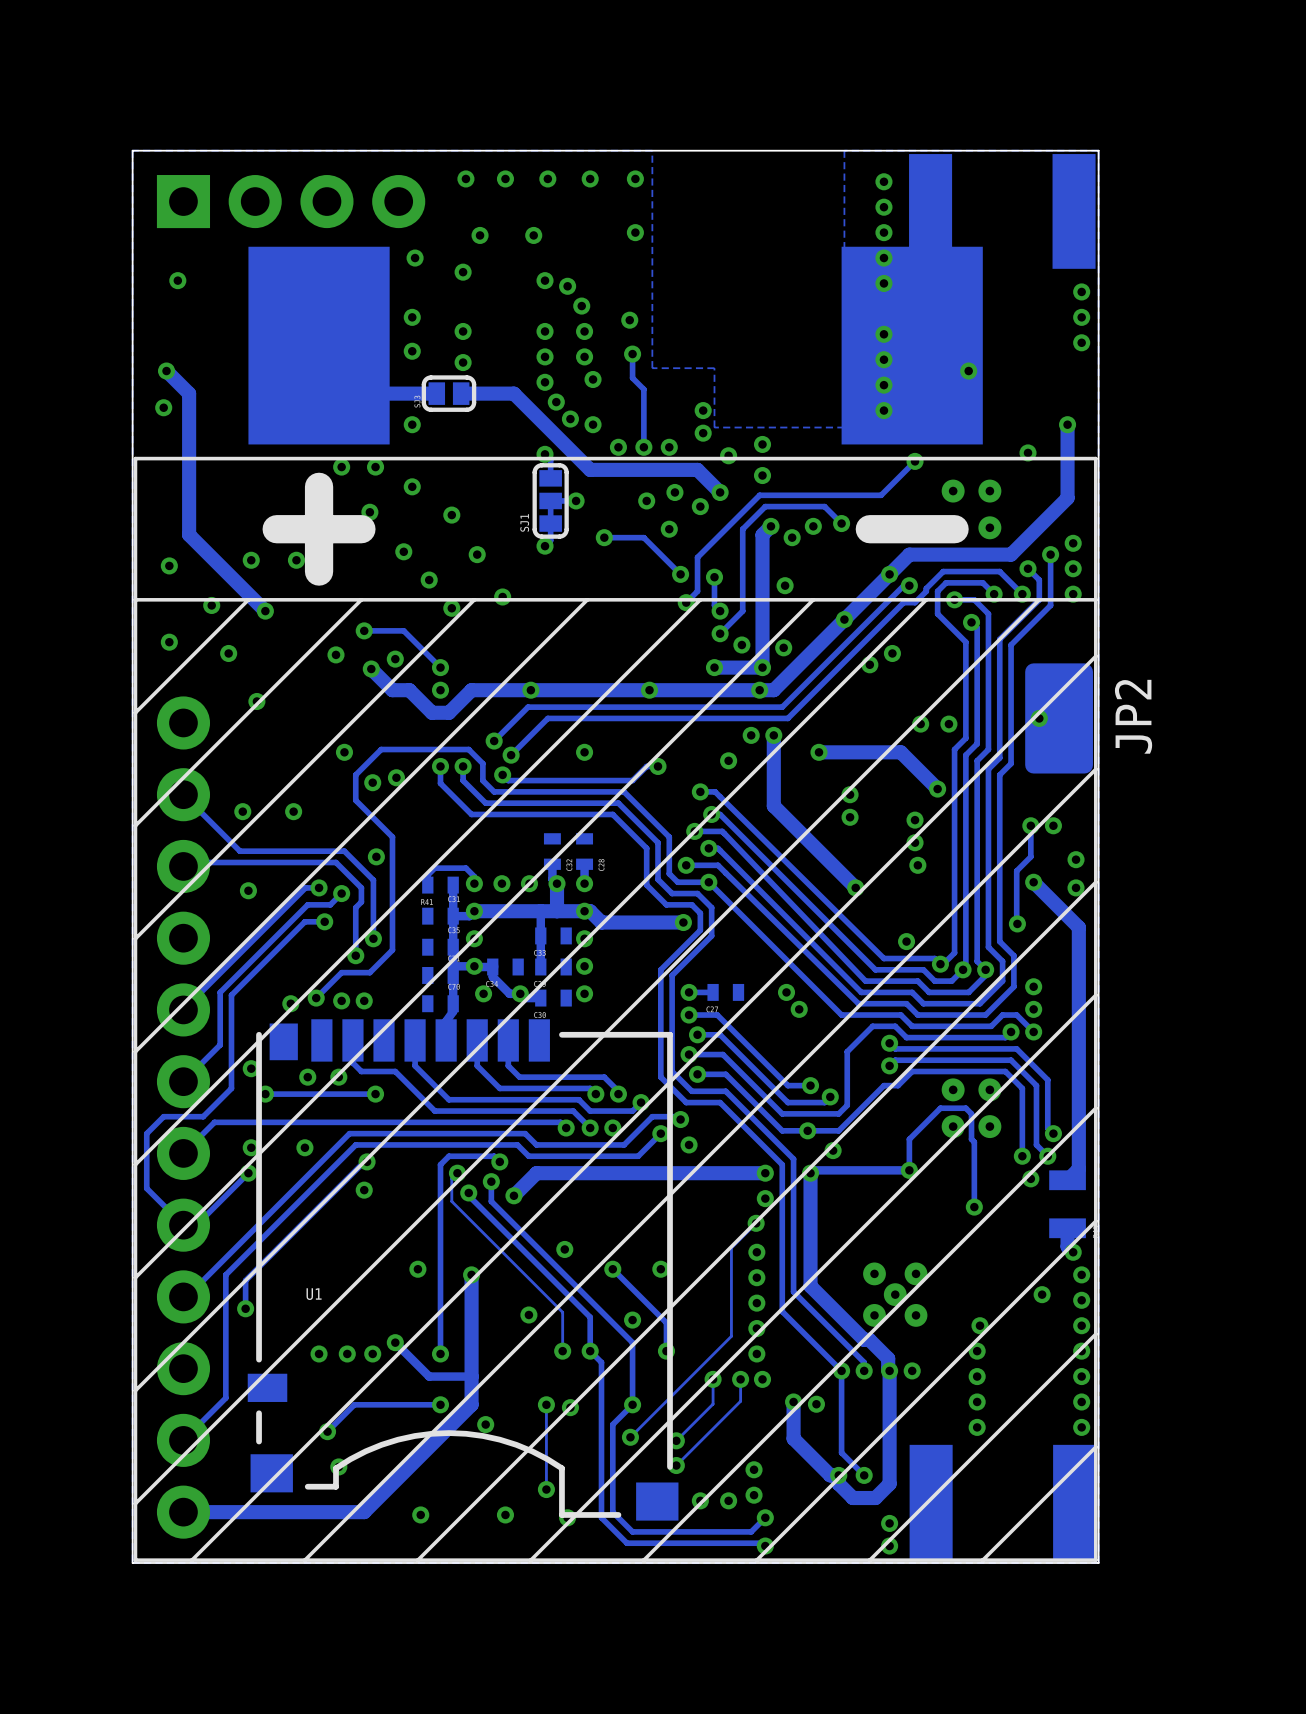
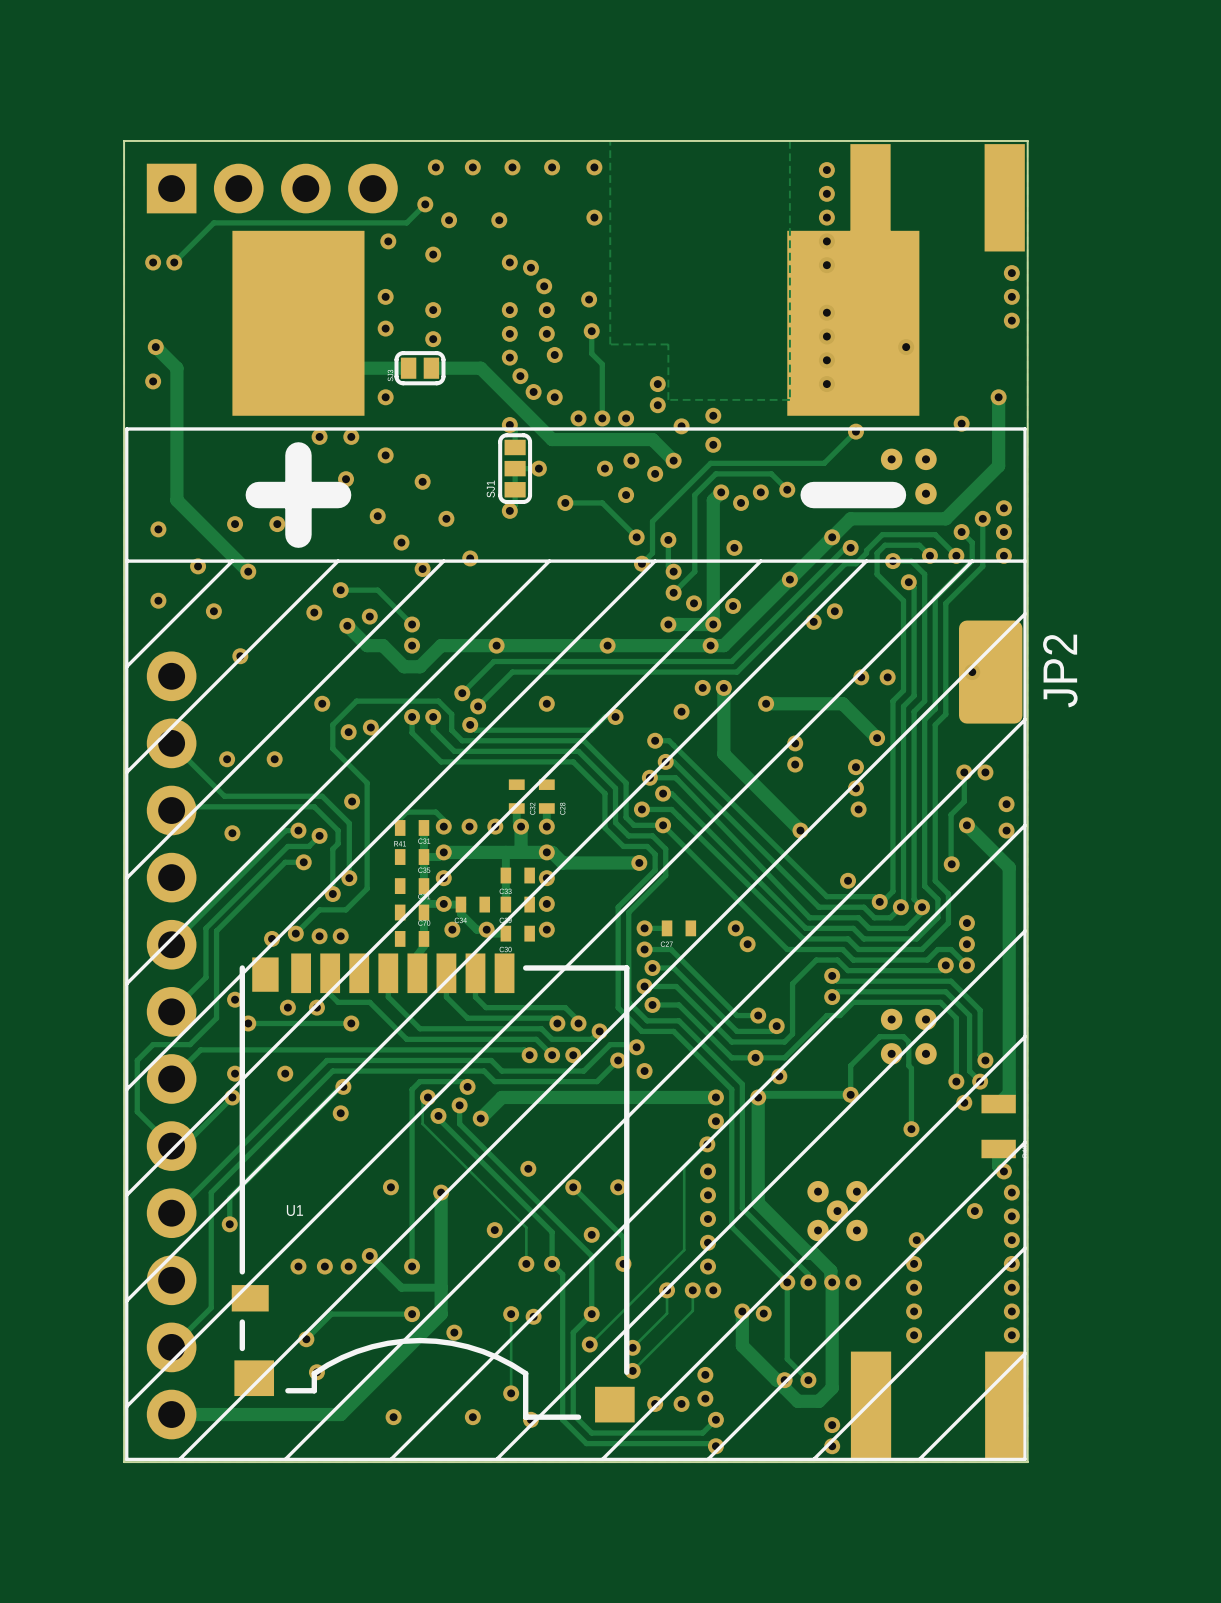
track: none -> (425, 204) (406, 222) (213, 222) (174, 262)
via: none -> (425, 204)
via: none -> (153, 262)
via: (177, 280) -> none
via: none -> (174, 262)

